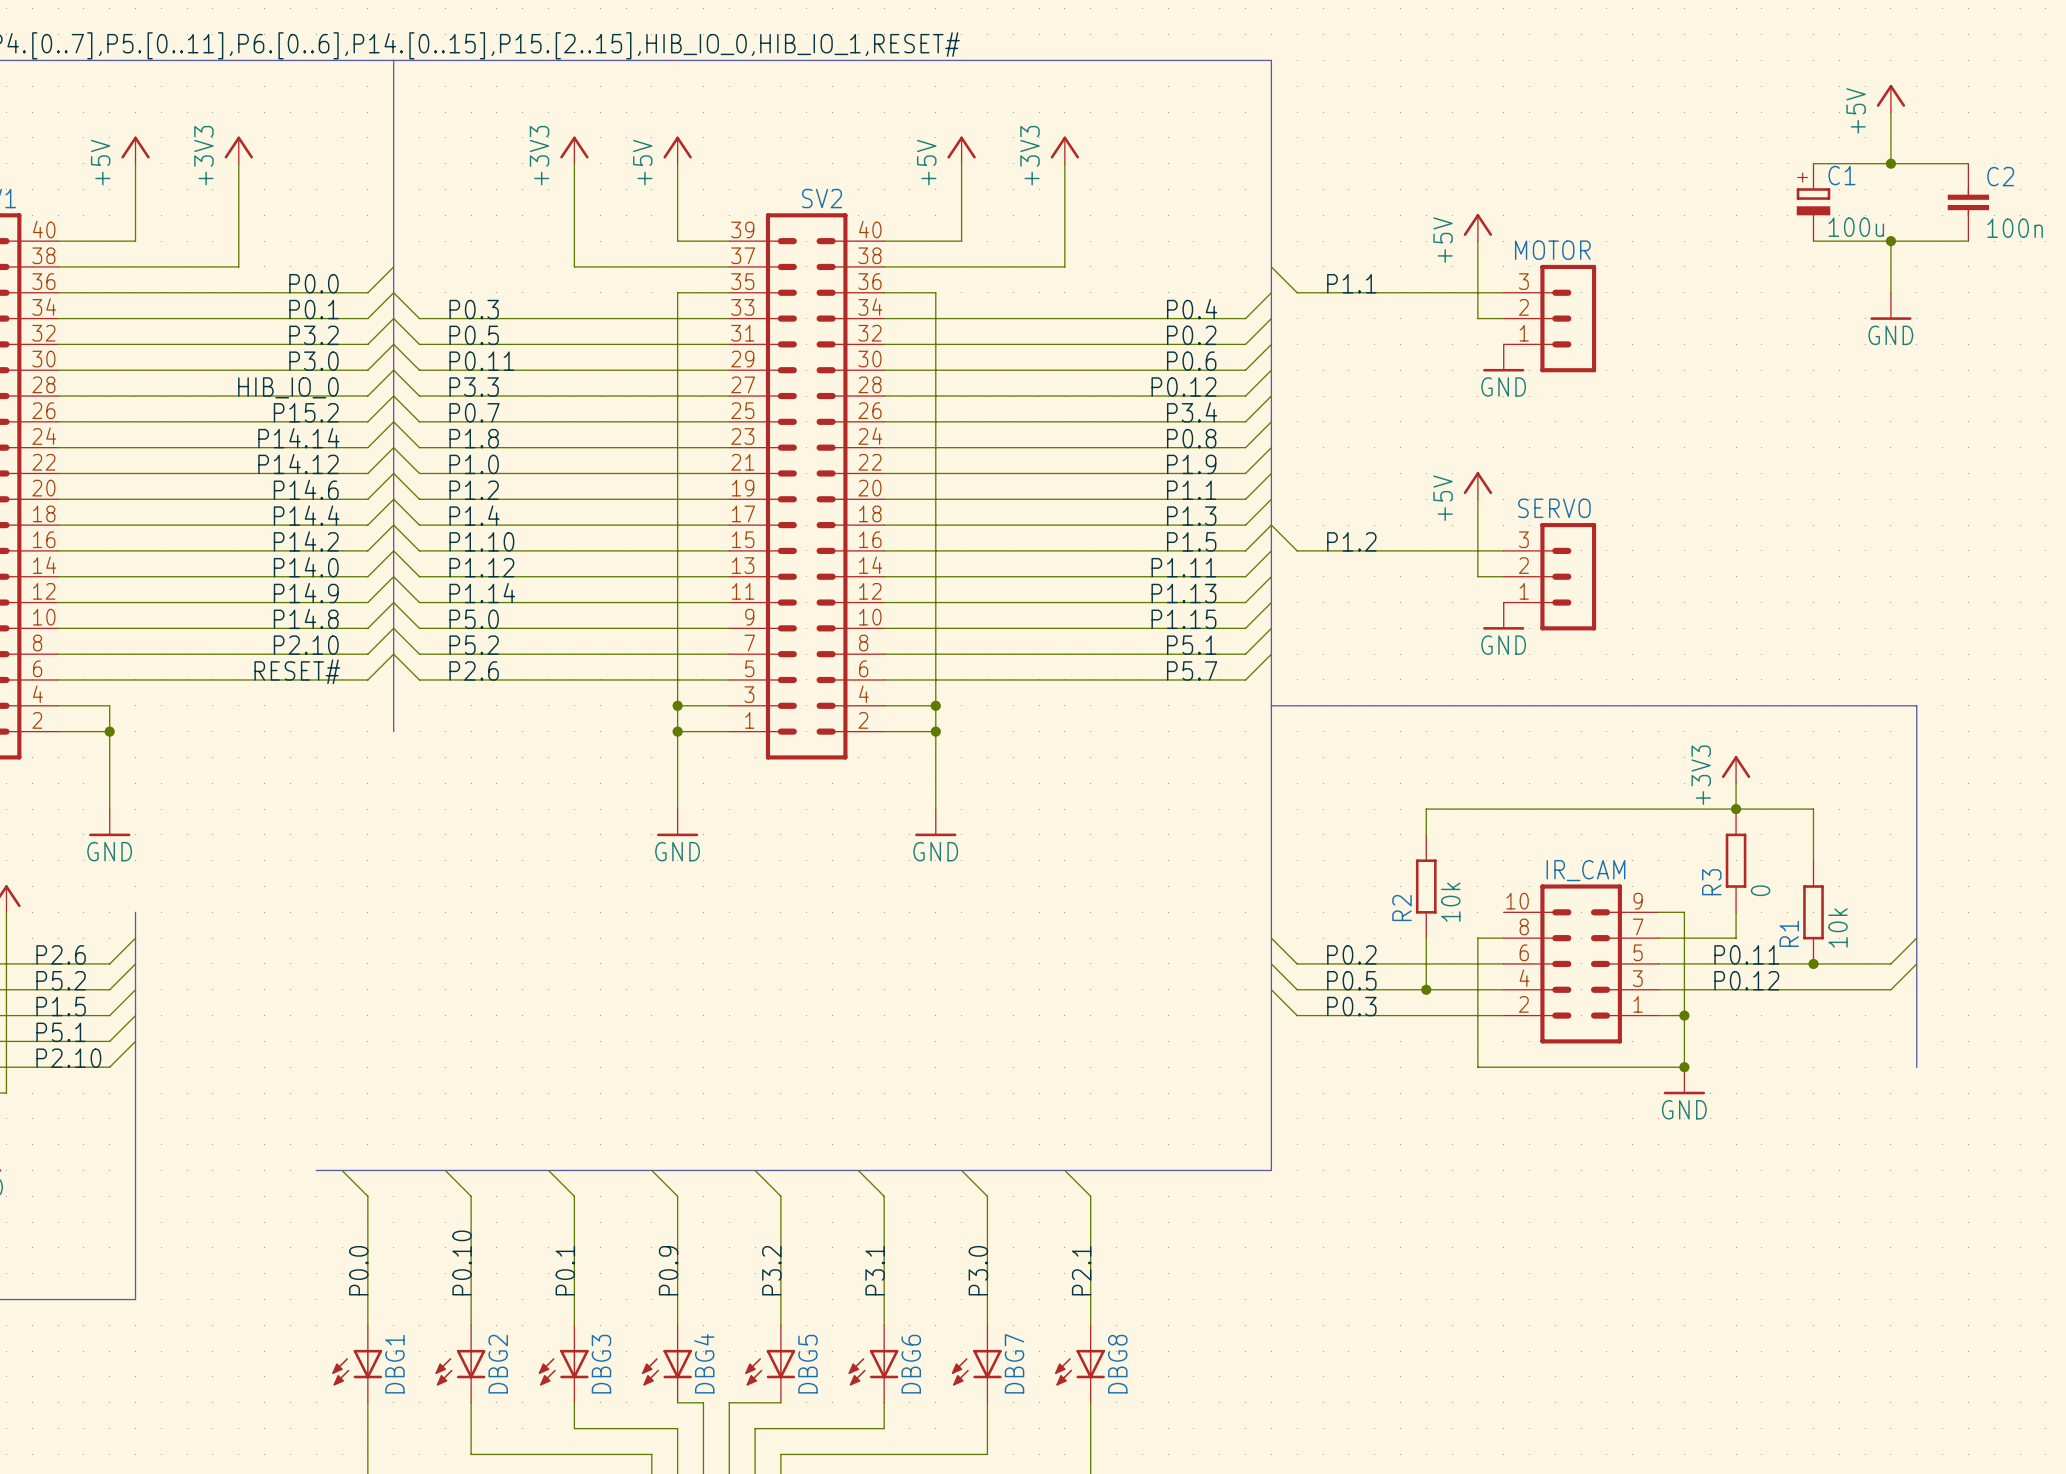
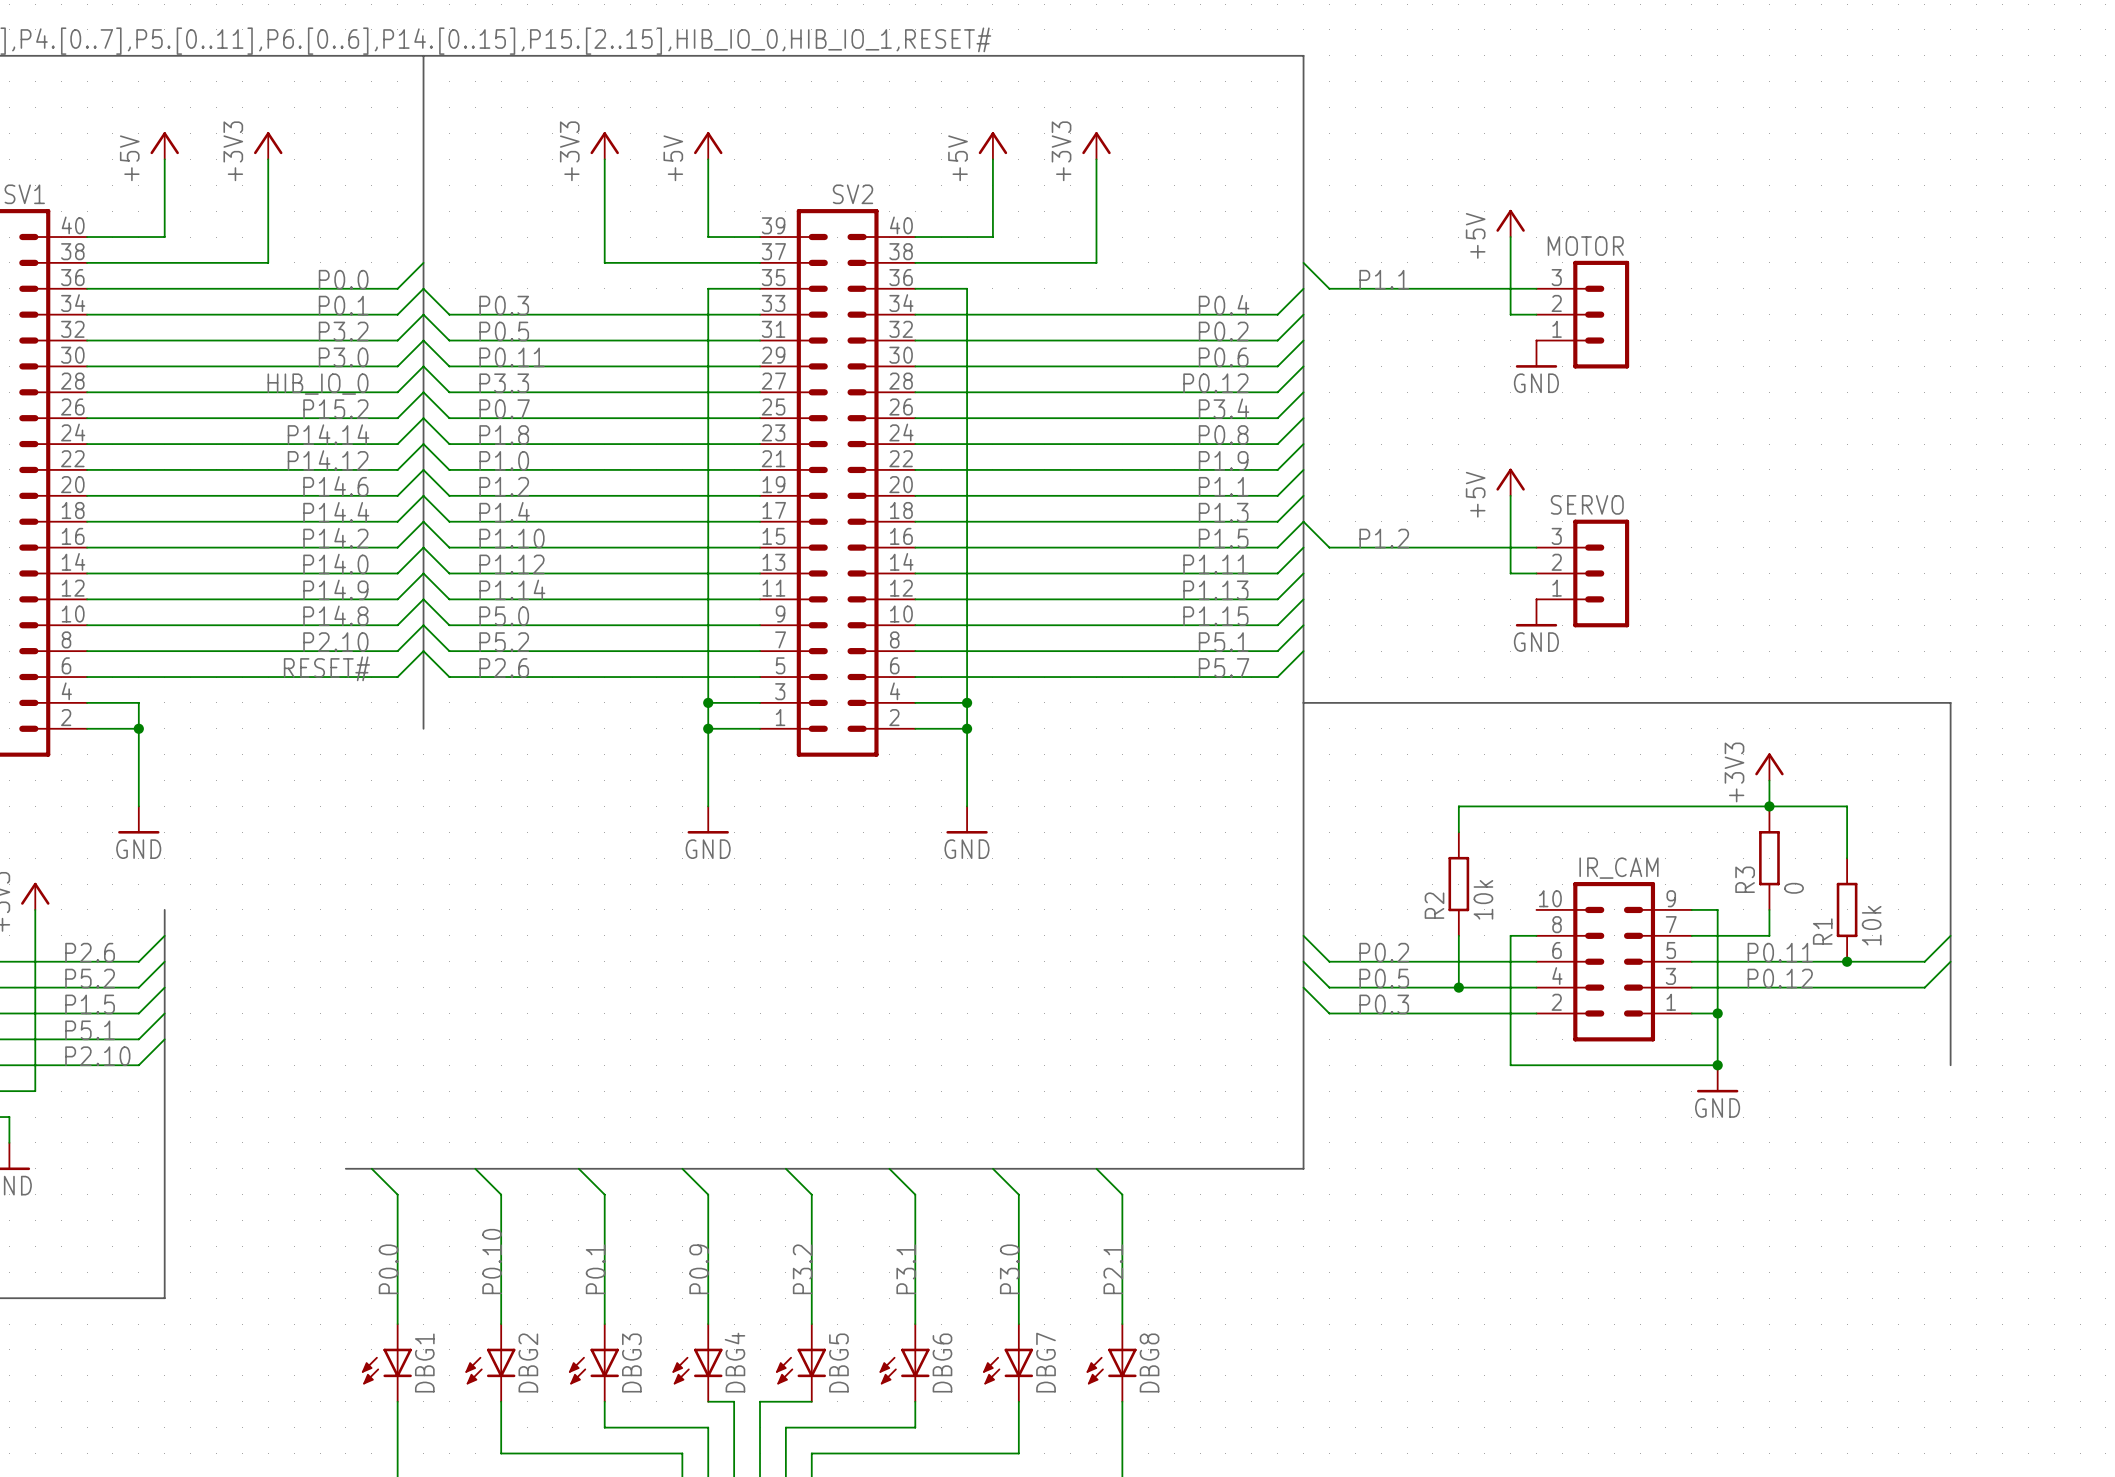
power symbol: +5V (1890, 98) -> none
wire: (1890, 112) (1890, 163) -> none
wire: (1813, 163) (1968, 163) -> none
junction: (1890, 163) -> none
C1: 100u (1813, 202) -> none
C2: 100n (1968, 202) -> none
wire: (1813, 241) (1968, 241) -> none
wire: (1890, 241) (1890, 292) -> none
junction: (1890, 241) -> none
power symbol: GND (1890, 306) -> none

